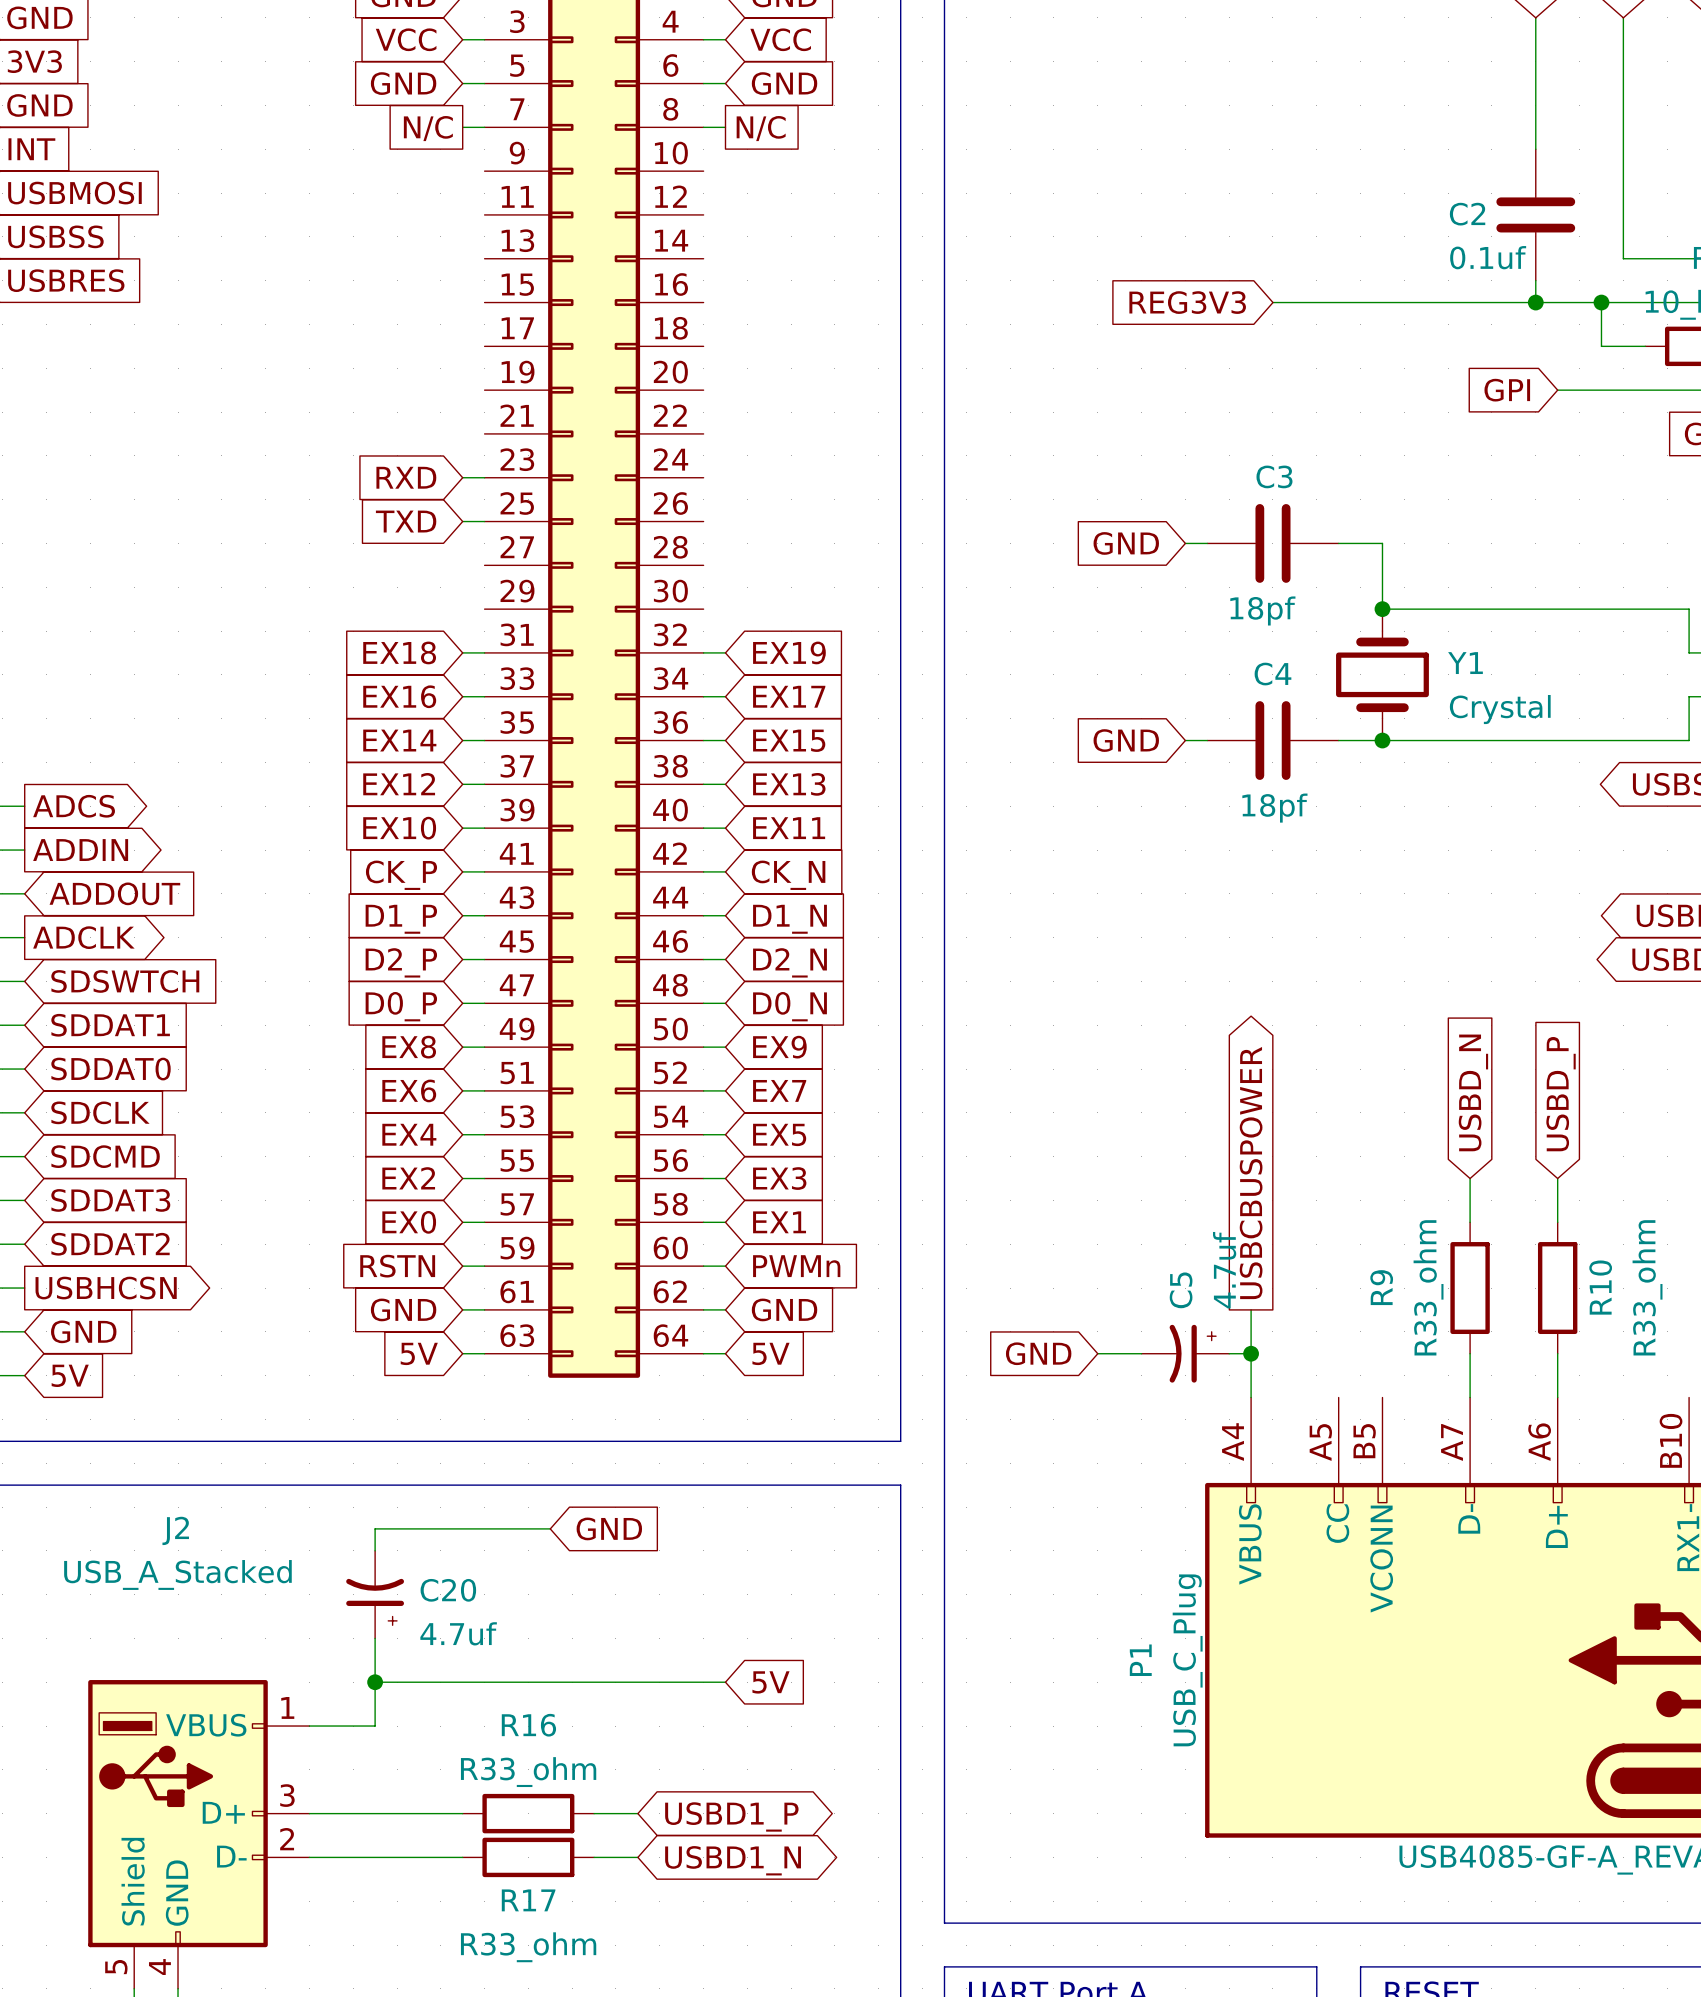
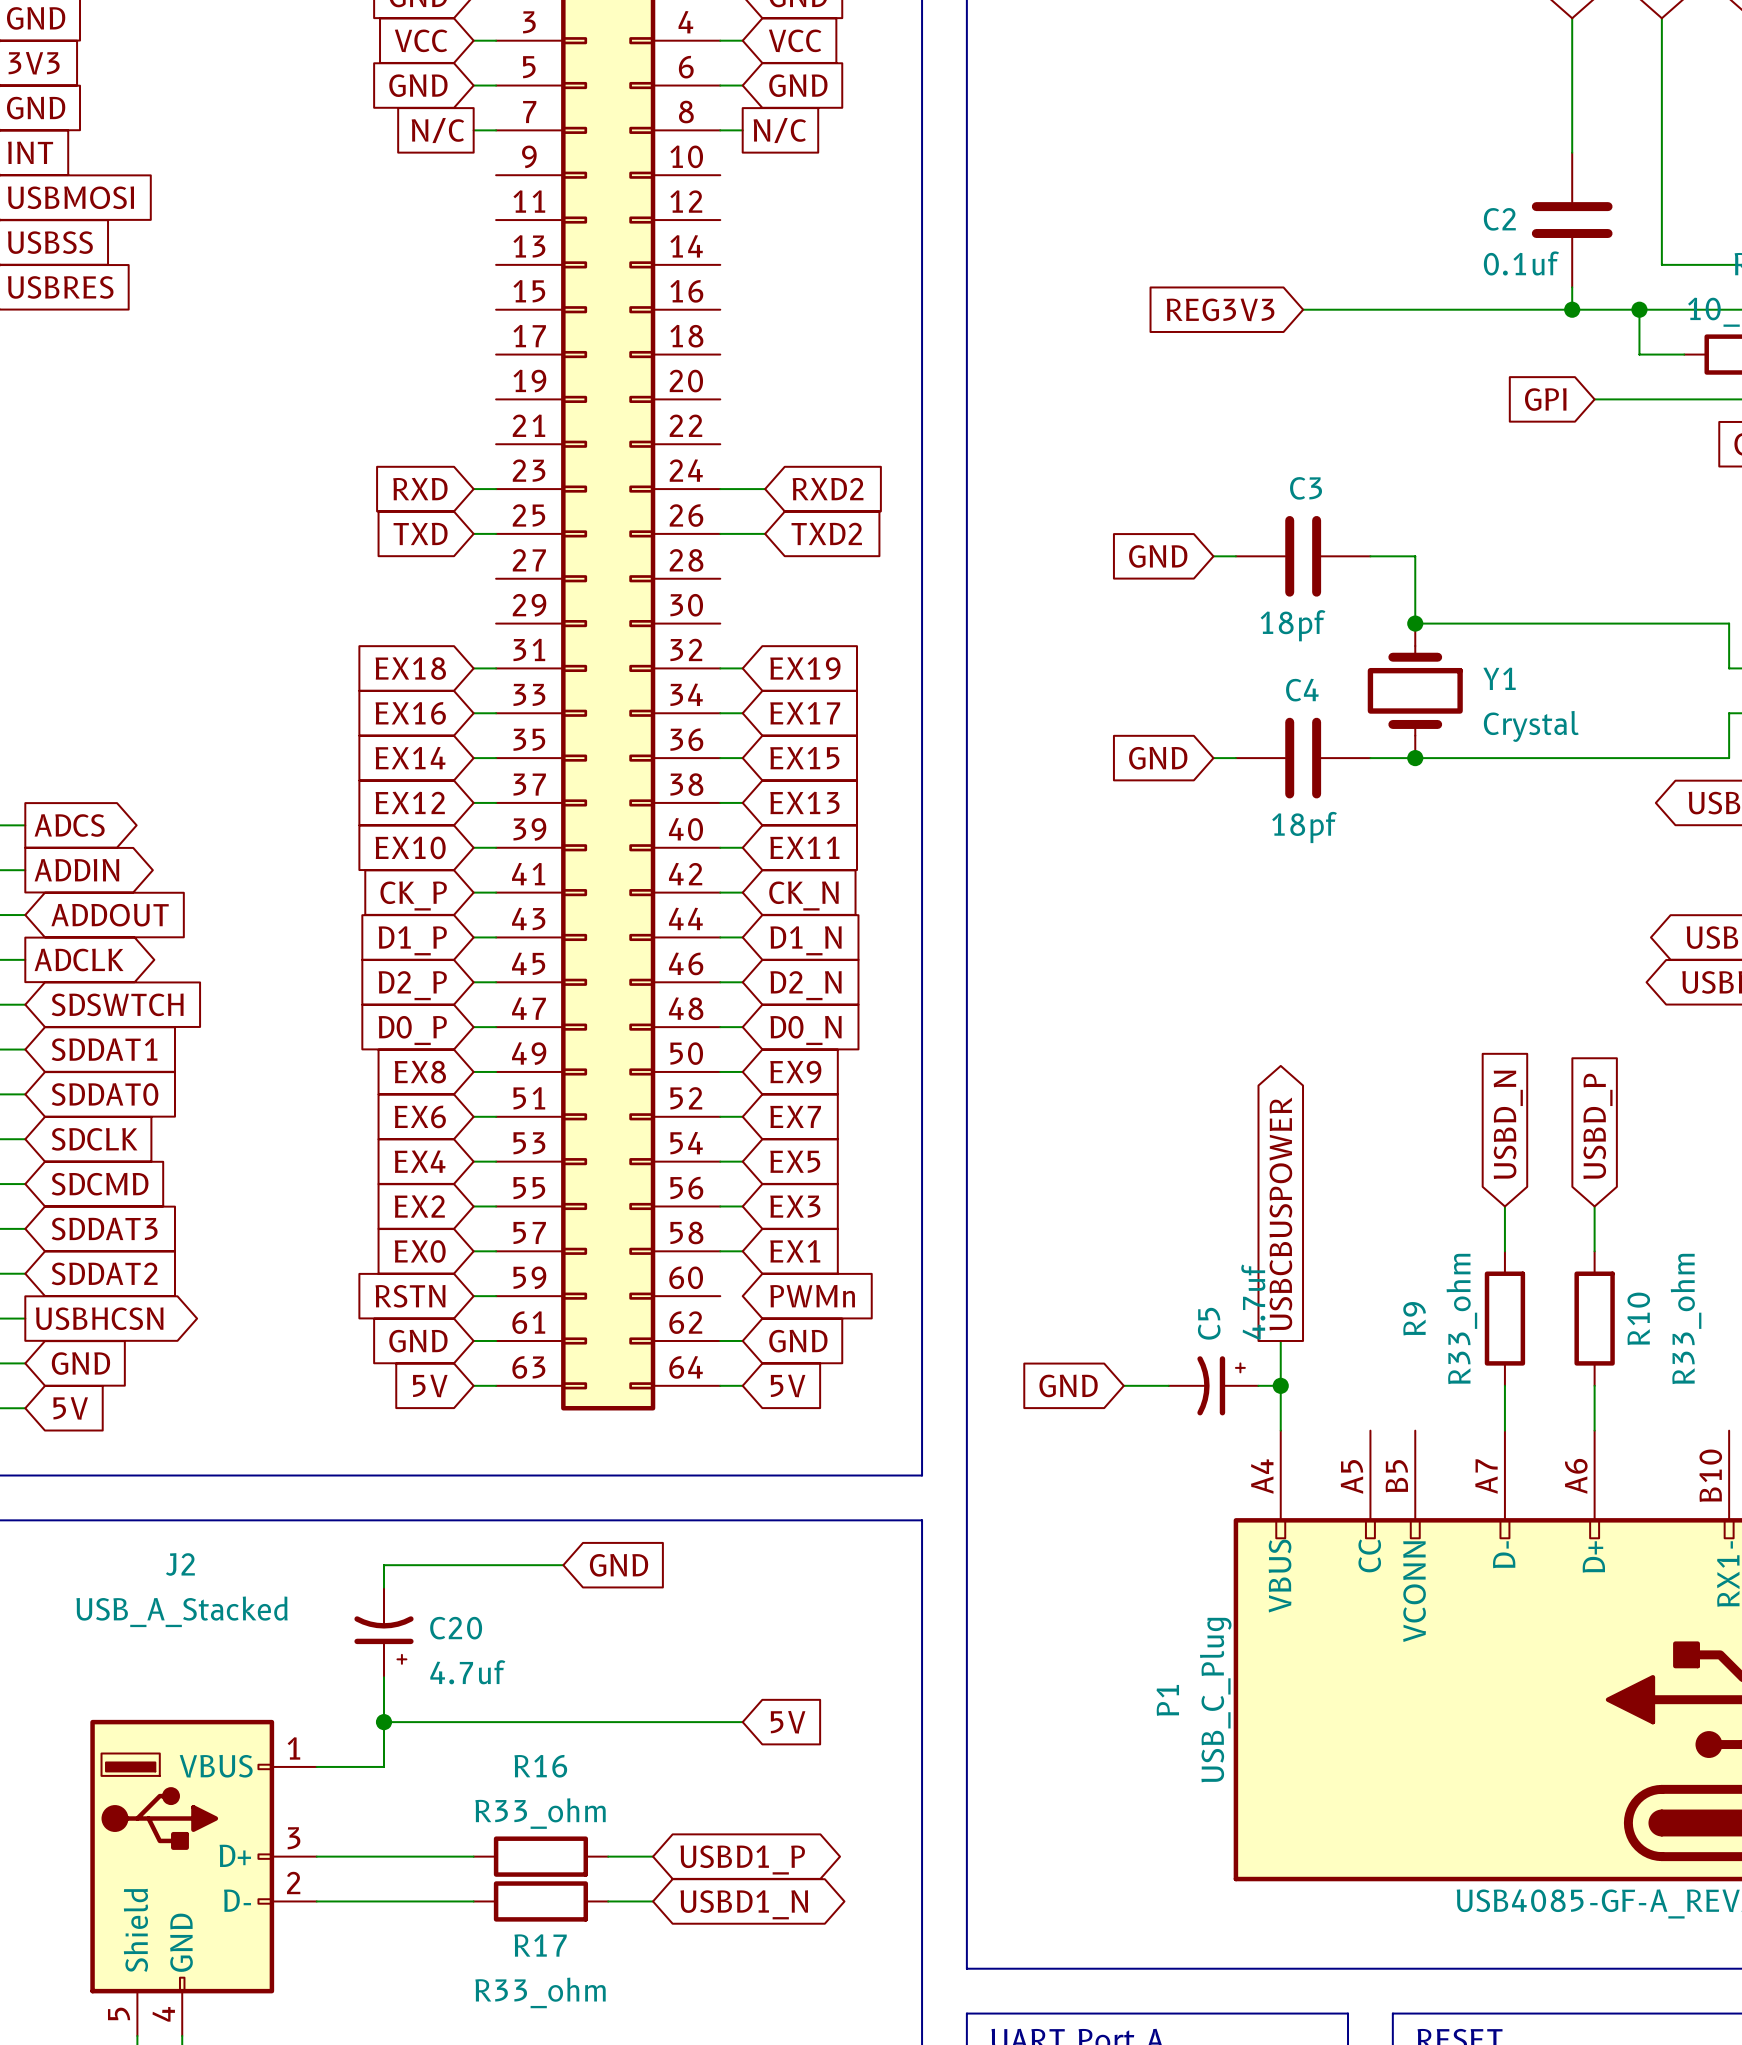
wire: none -> (720, 489) (765, 489)
global label: none -> RXD2 (828, 489)
wire: none -> (720, 533) (765, 533)
global label: none -> TXD2 (826, 533)
wire: (703, 1266) (725, 1266) -> none

